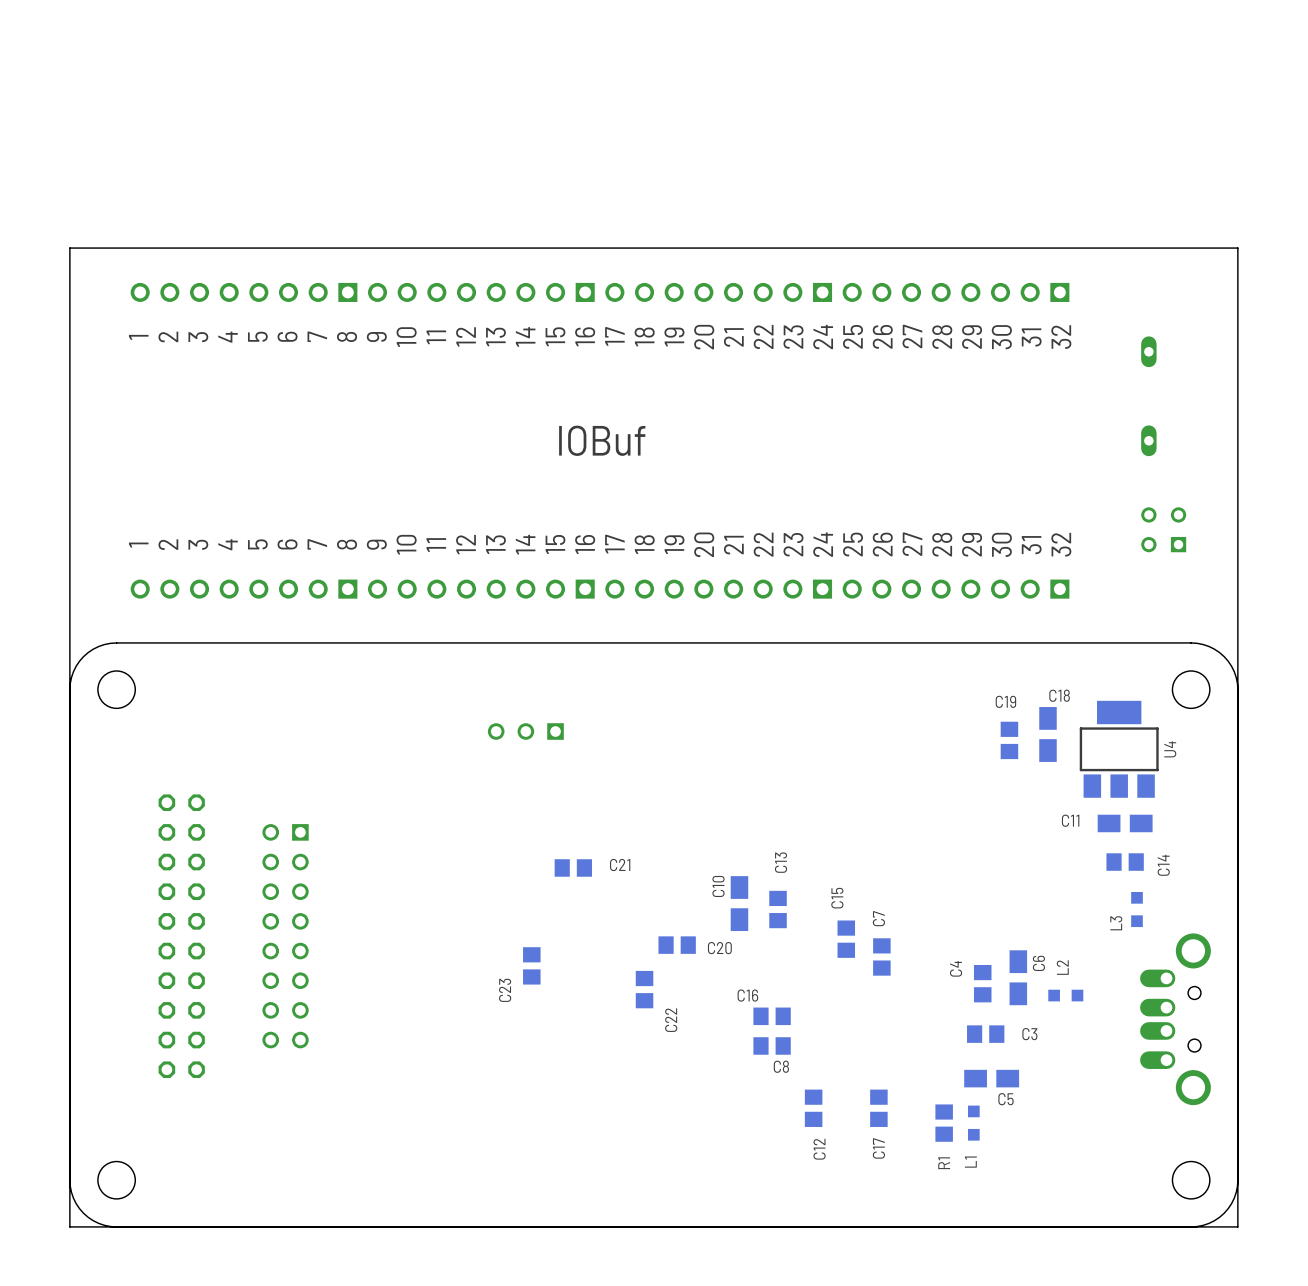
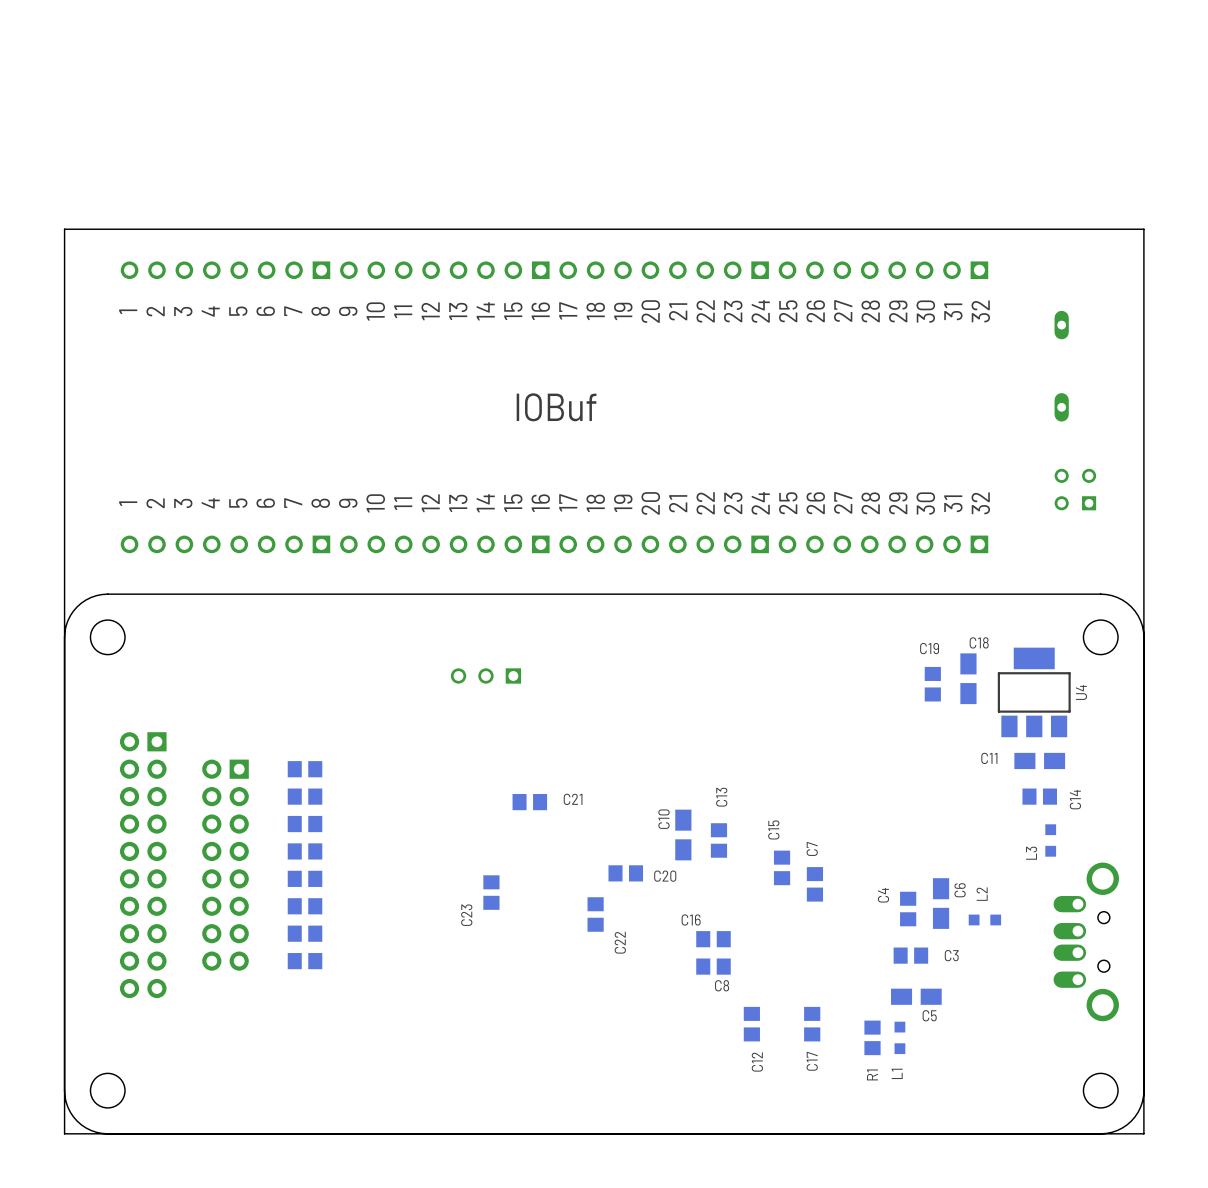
part: none -> (305, 769)
part: none -> (305, 796)
part: none -> (305, 824)
part: none -> (305, 851)
part: none -> (143, 865)
part: (181, 936) -> none
part: none -> (225, 865)
part: (285, 936) -> none
part: none -> (305, 878)
part: none -> (305, 906)
part: none -> (305, 933)
part: none -> (305, 961)

